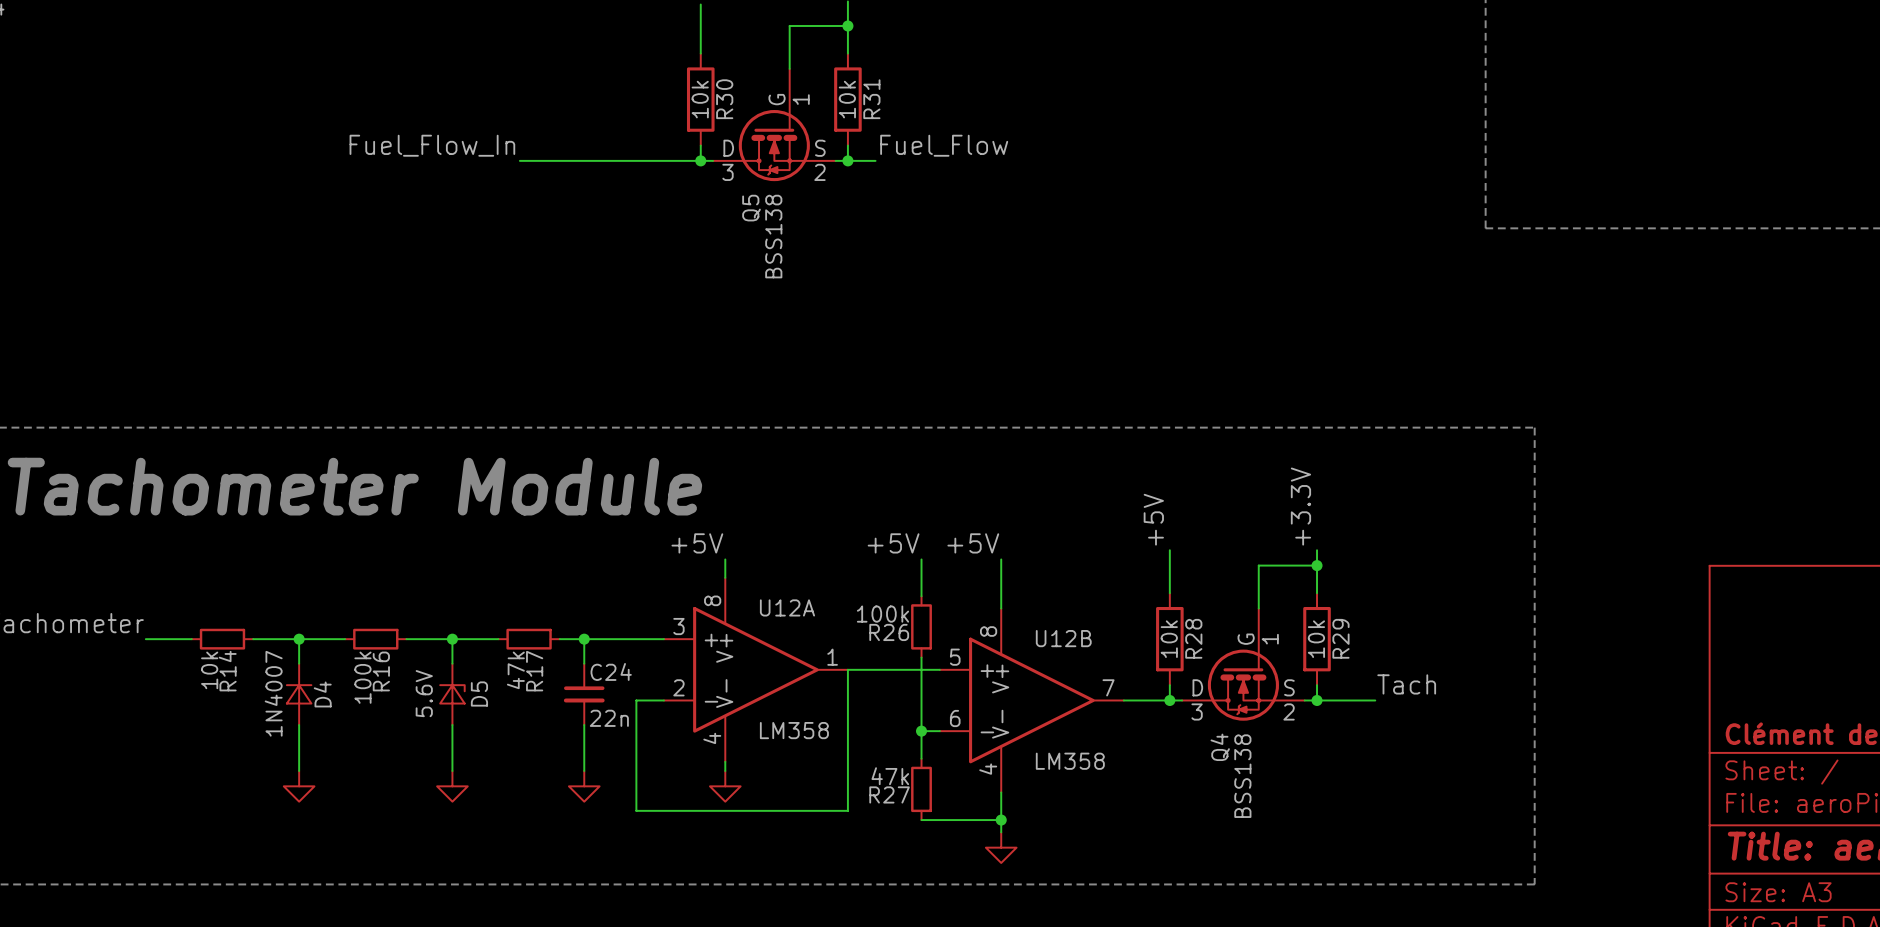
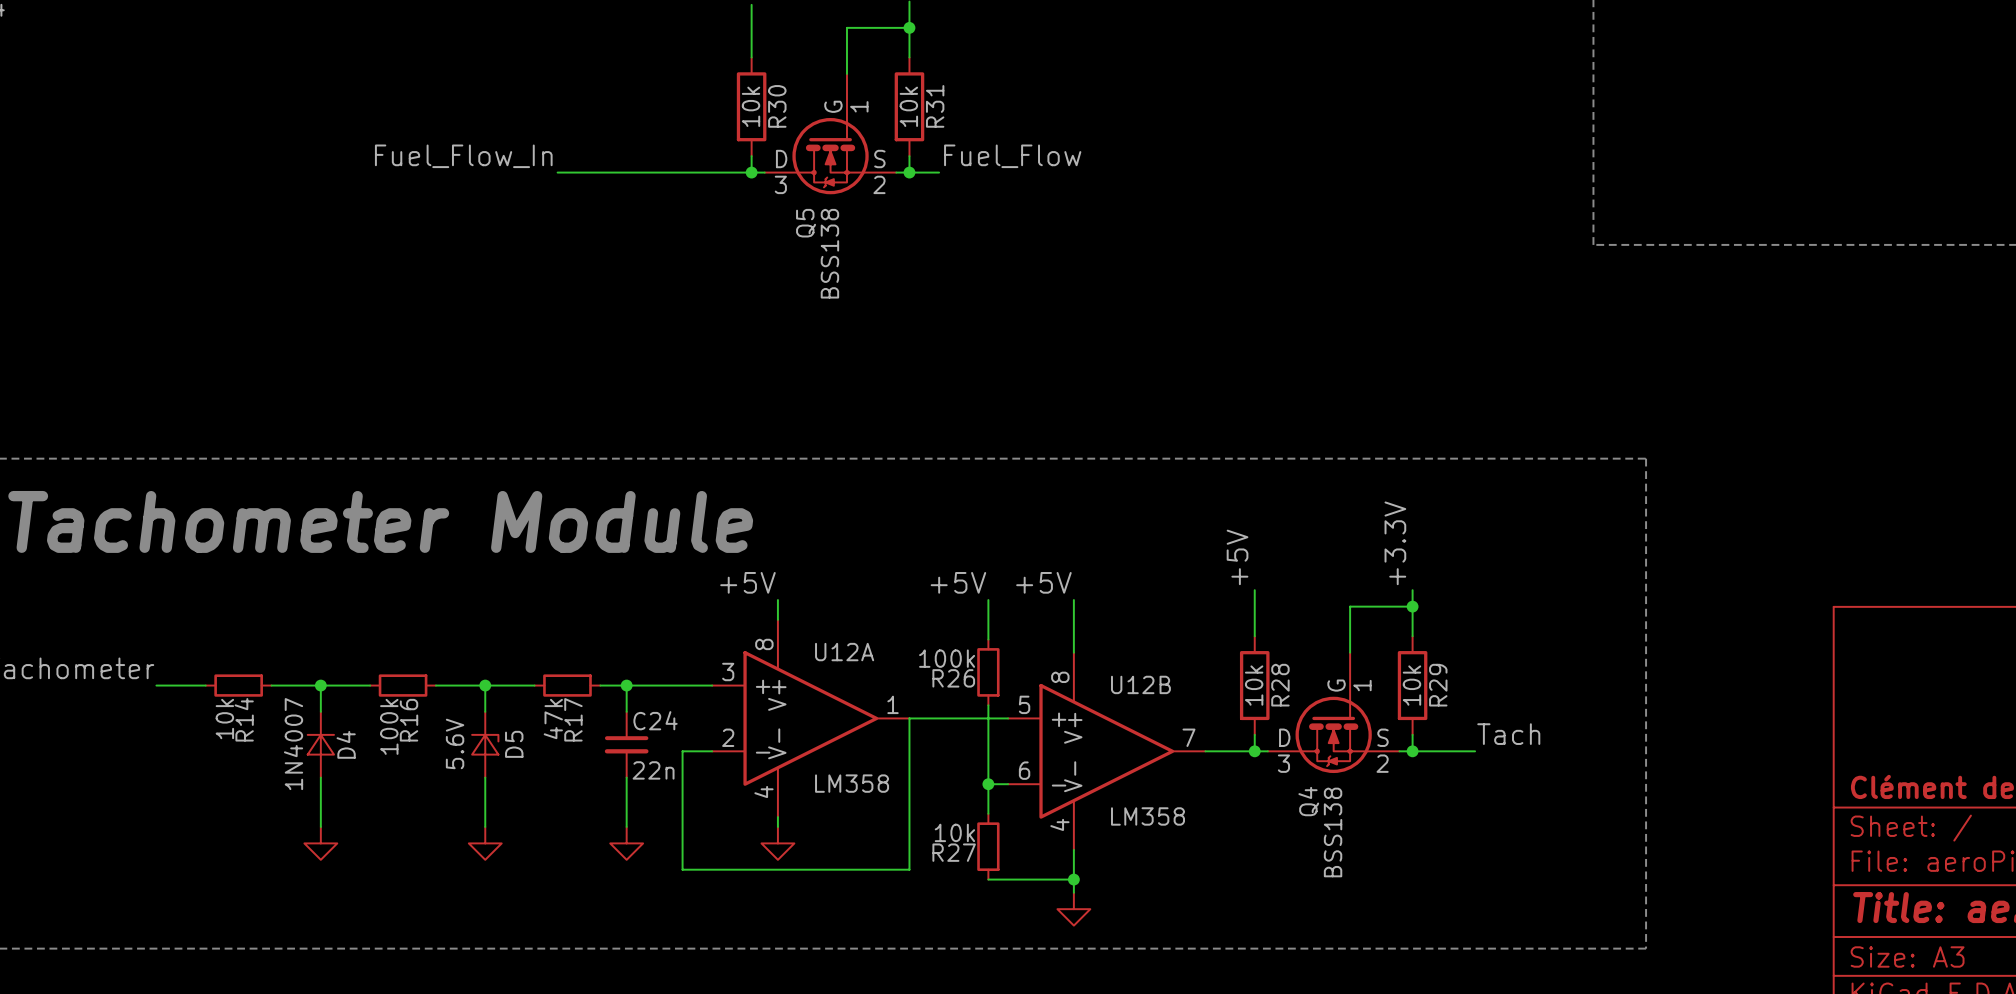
R27 value: 47k (890, 776) -> 10k (954, 832)

